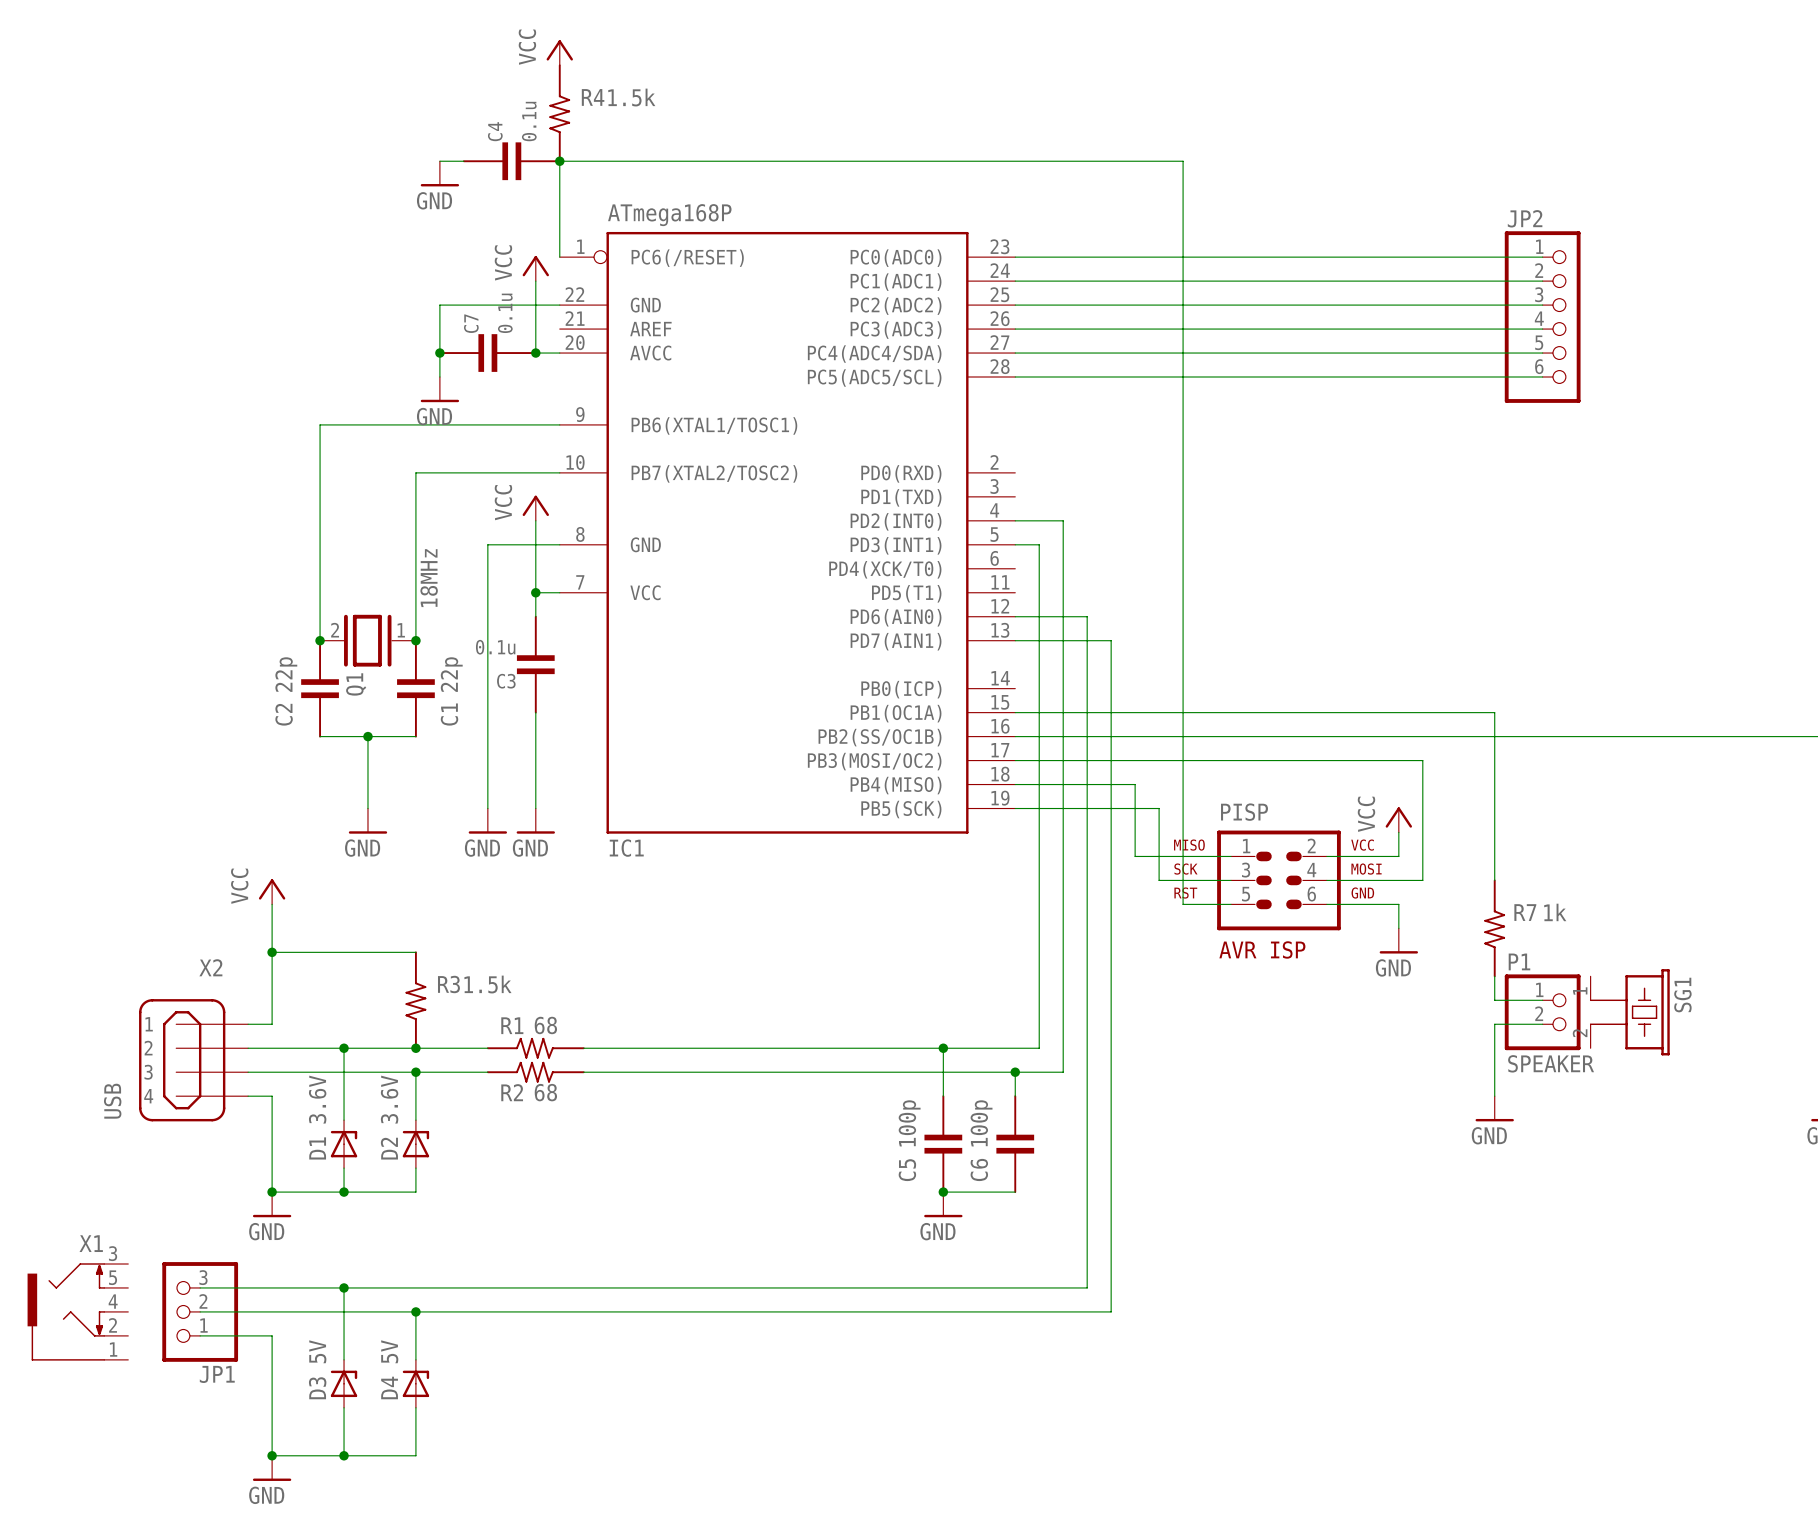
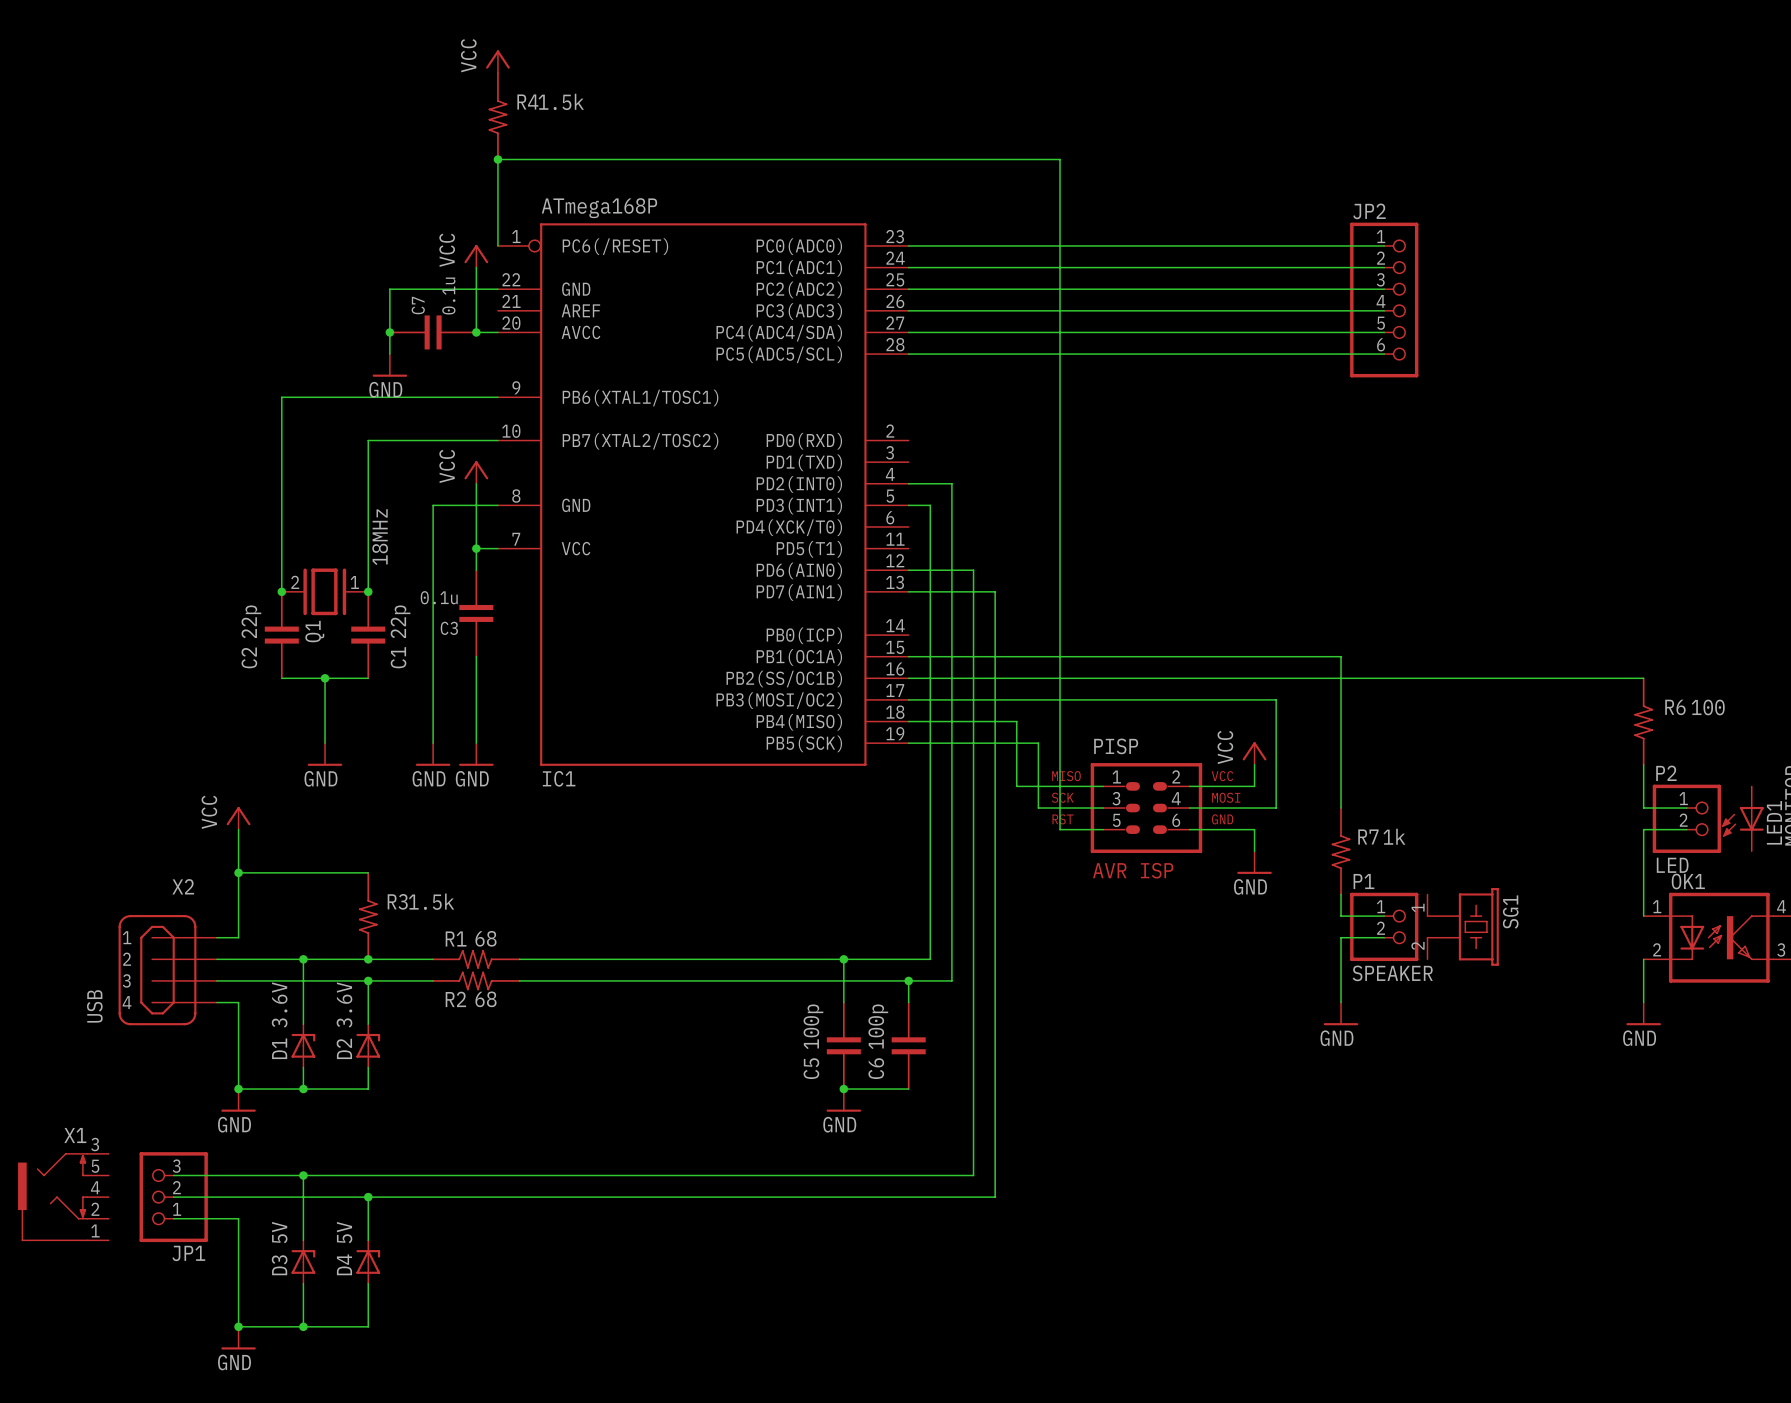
wire: (439, 161) (463, 161) -> none
C4: 0.1u (511, 161) -> none
power symbol: GND (439, 173) -> none

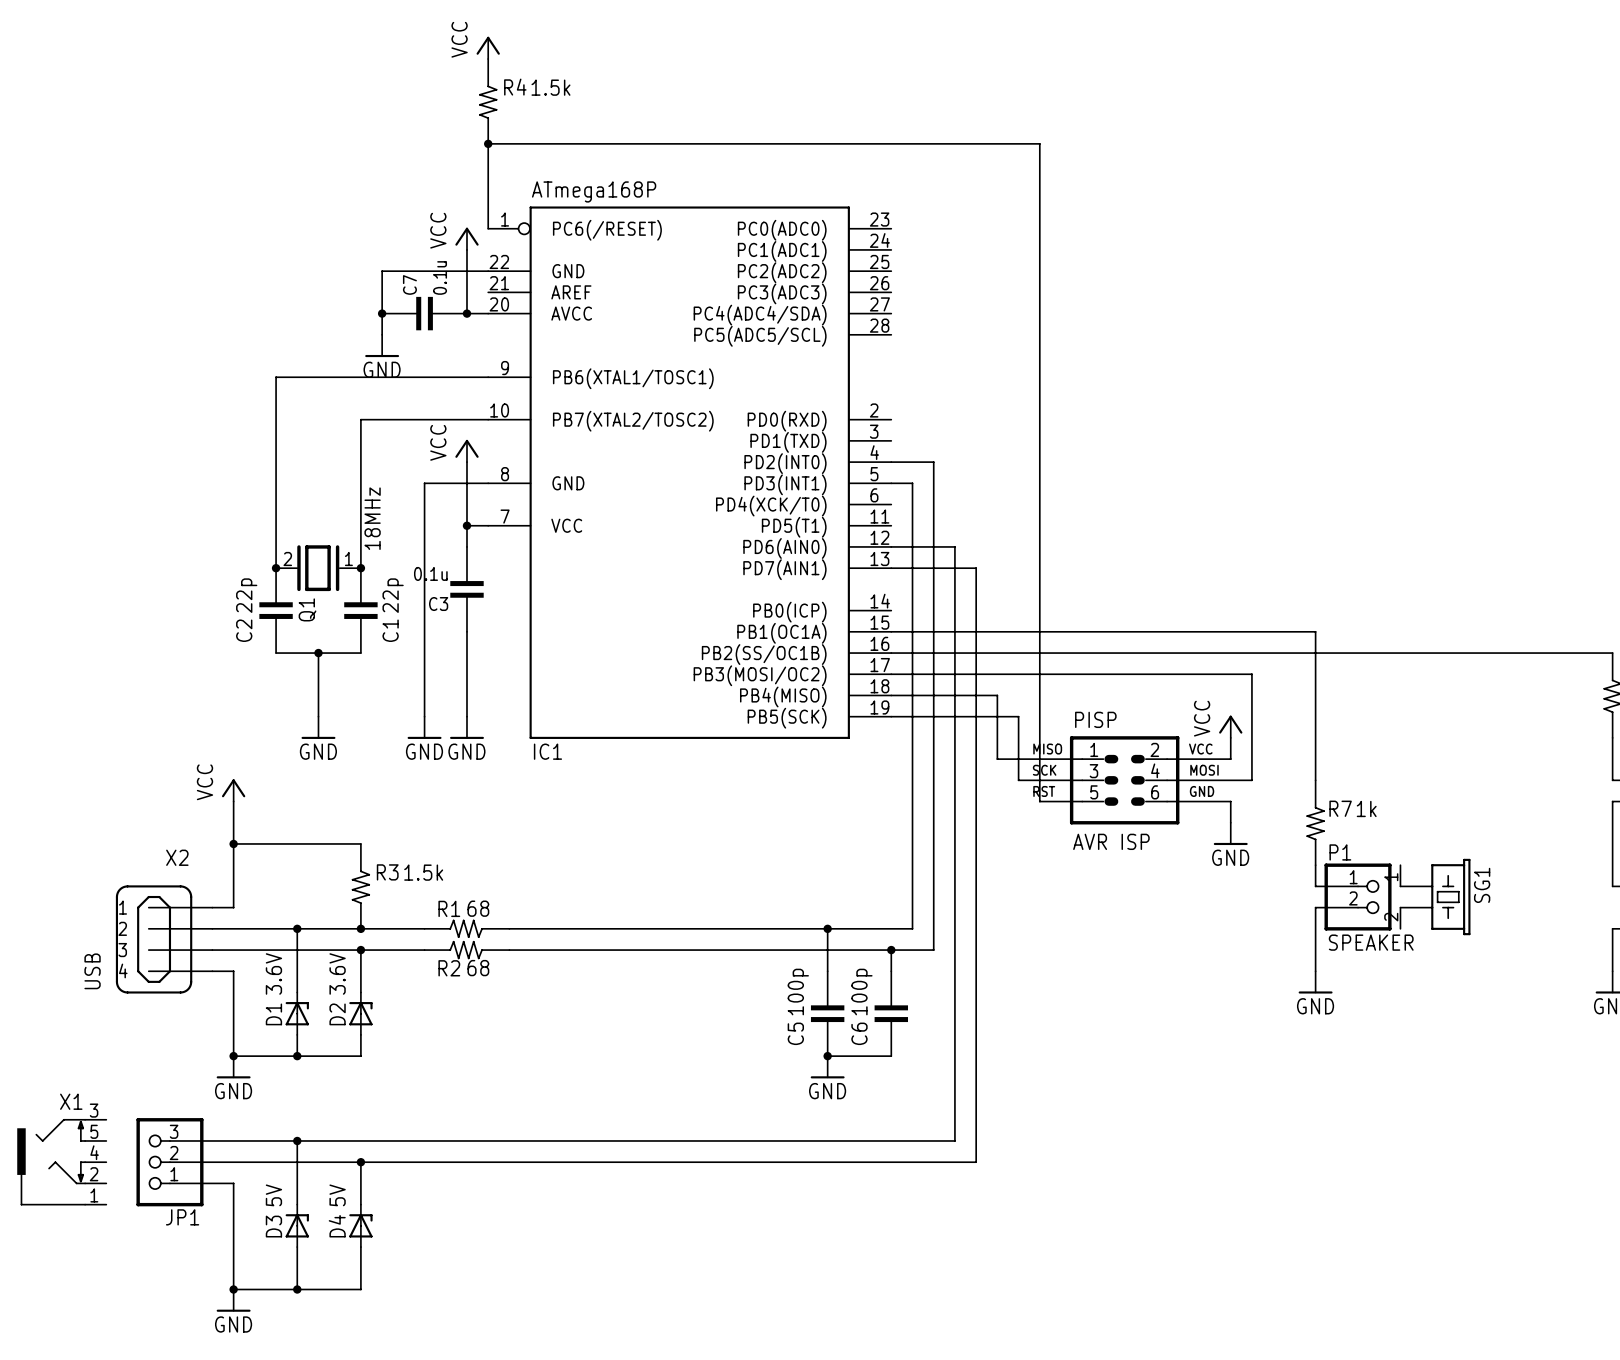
wire: (908, 245) (1384, 245) -> none
wire: (908, 267) (1384, 267) -> none
wire: (908, 289) (1384, 289) -> none
JP2: (1384, 300) -> none
wire: (908, 310) (1384, 310) -> none
wire: (908, 332) (1384, 332) -> none
wire: (908, 354) (1384, 354) -> none

